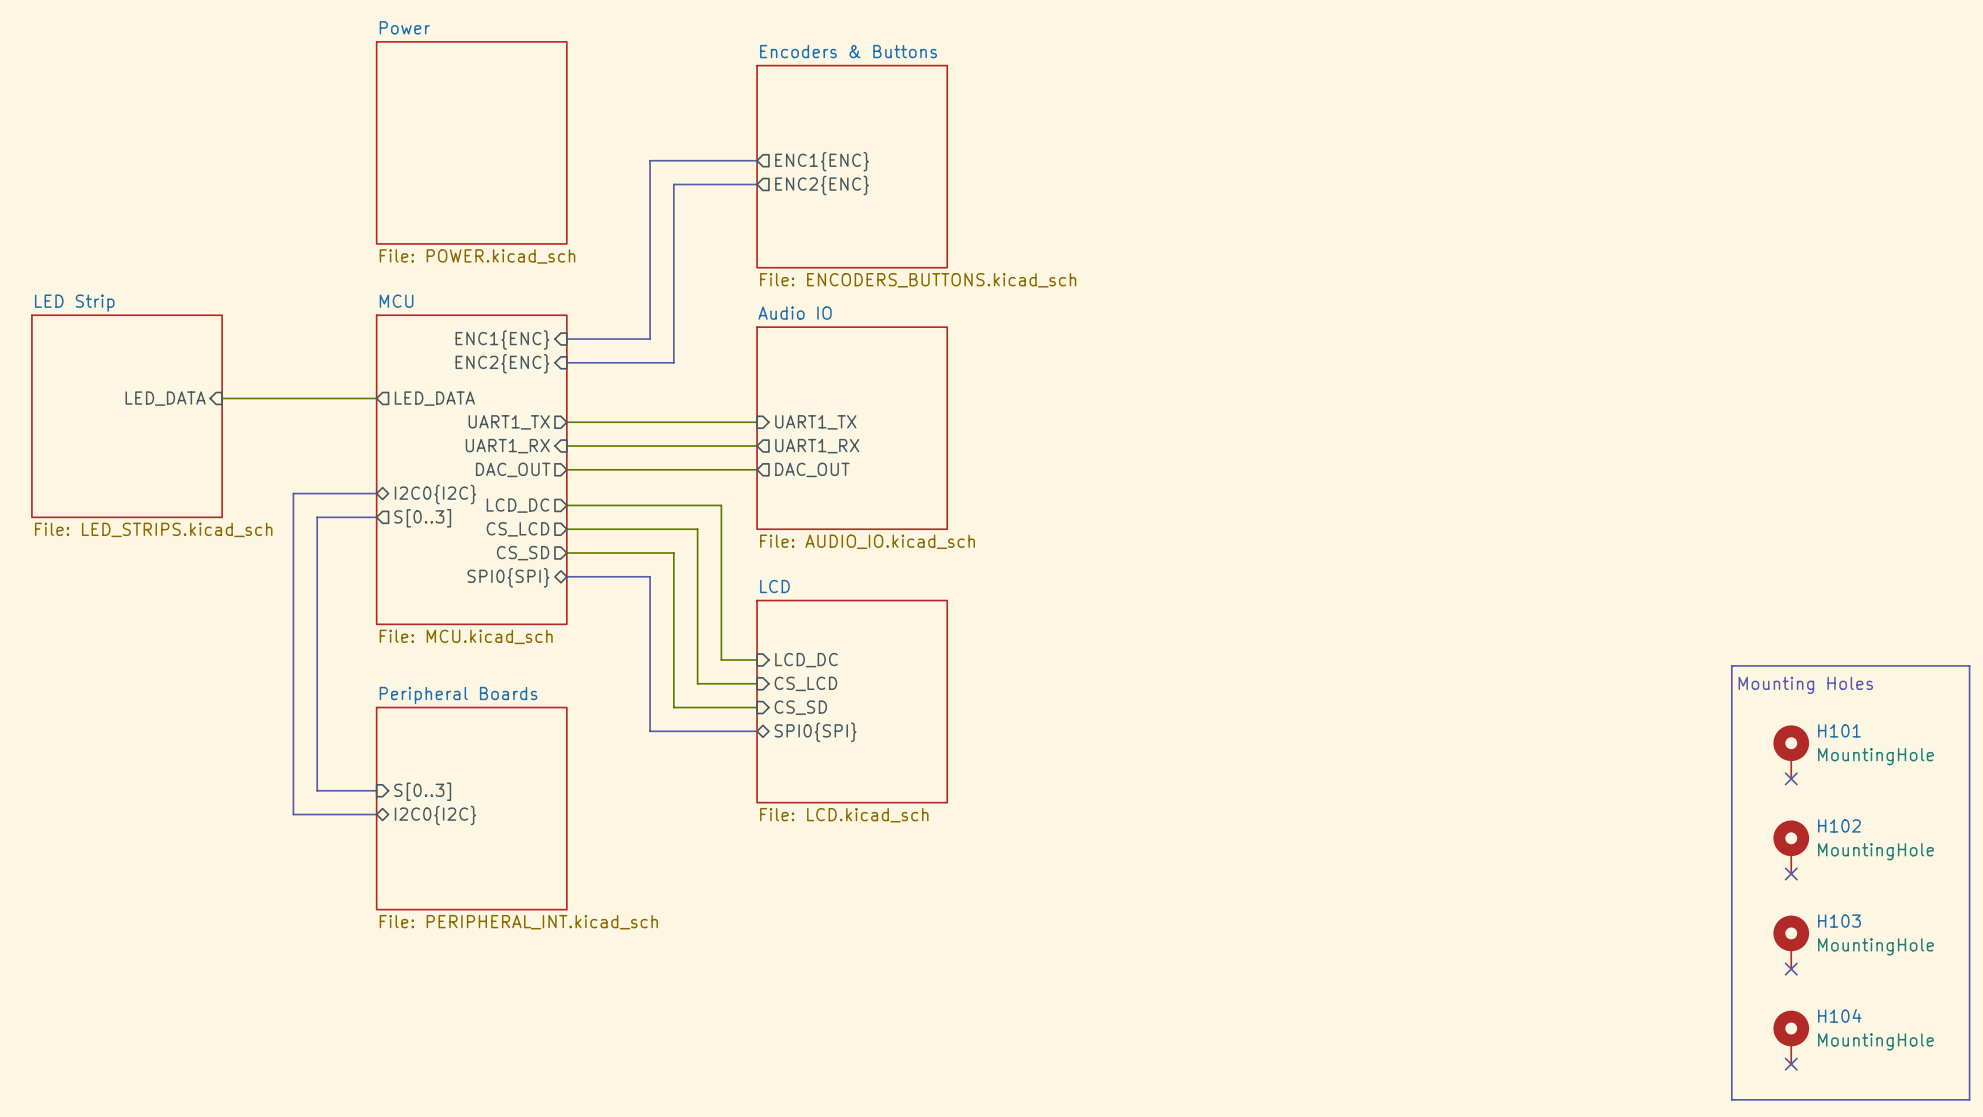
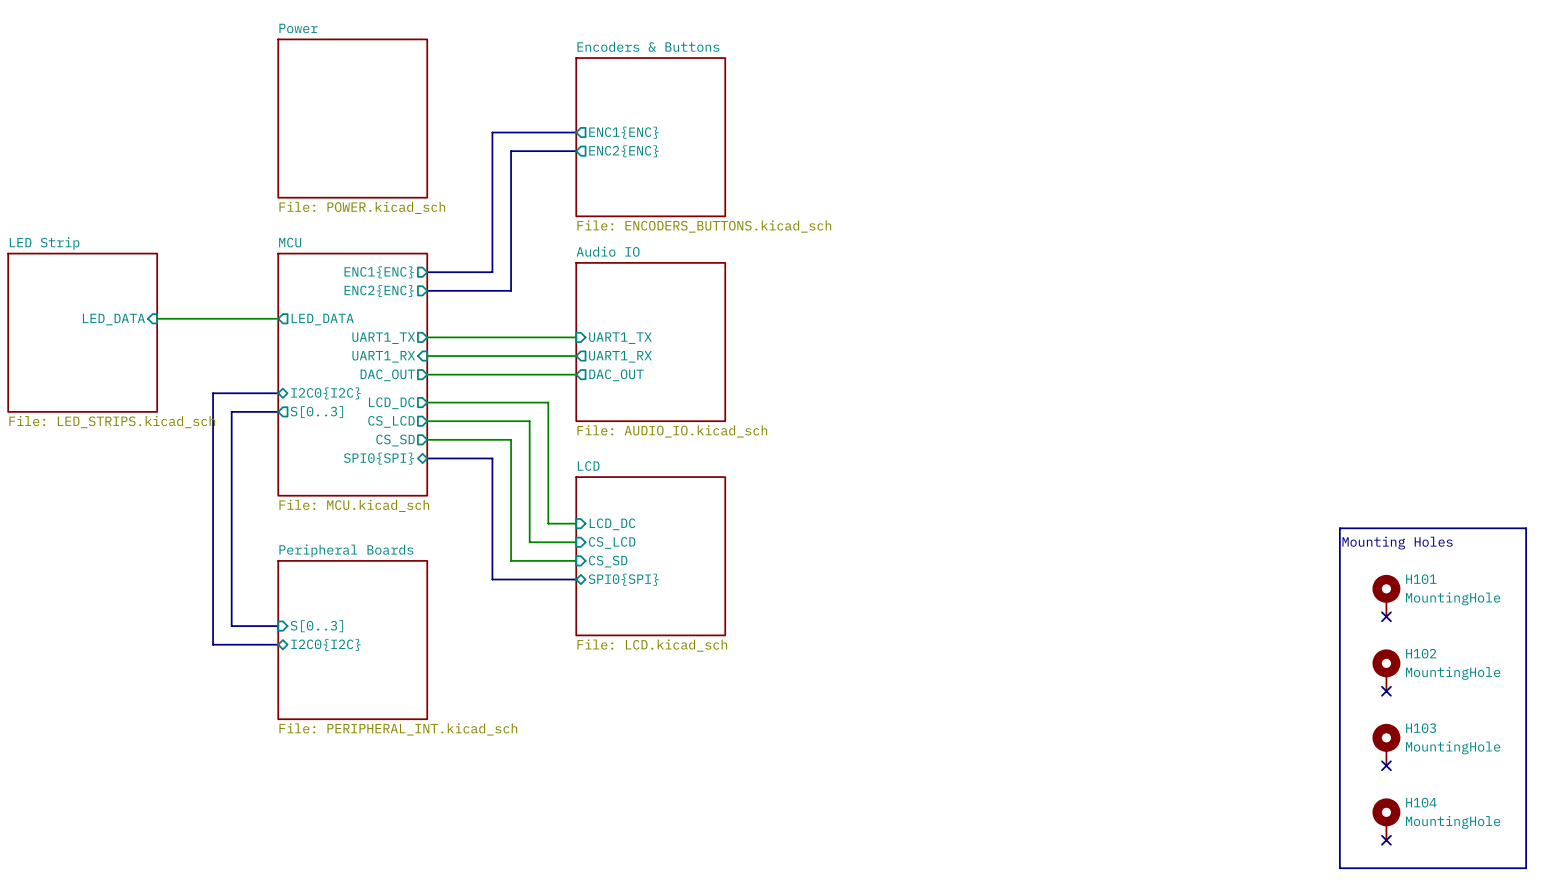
sheet pin shape: input (502, 340) -> output (379, 272)
sheet pin shape: input (502, 363) -> output (379, 290)

